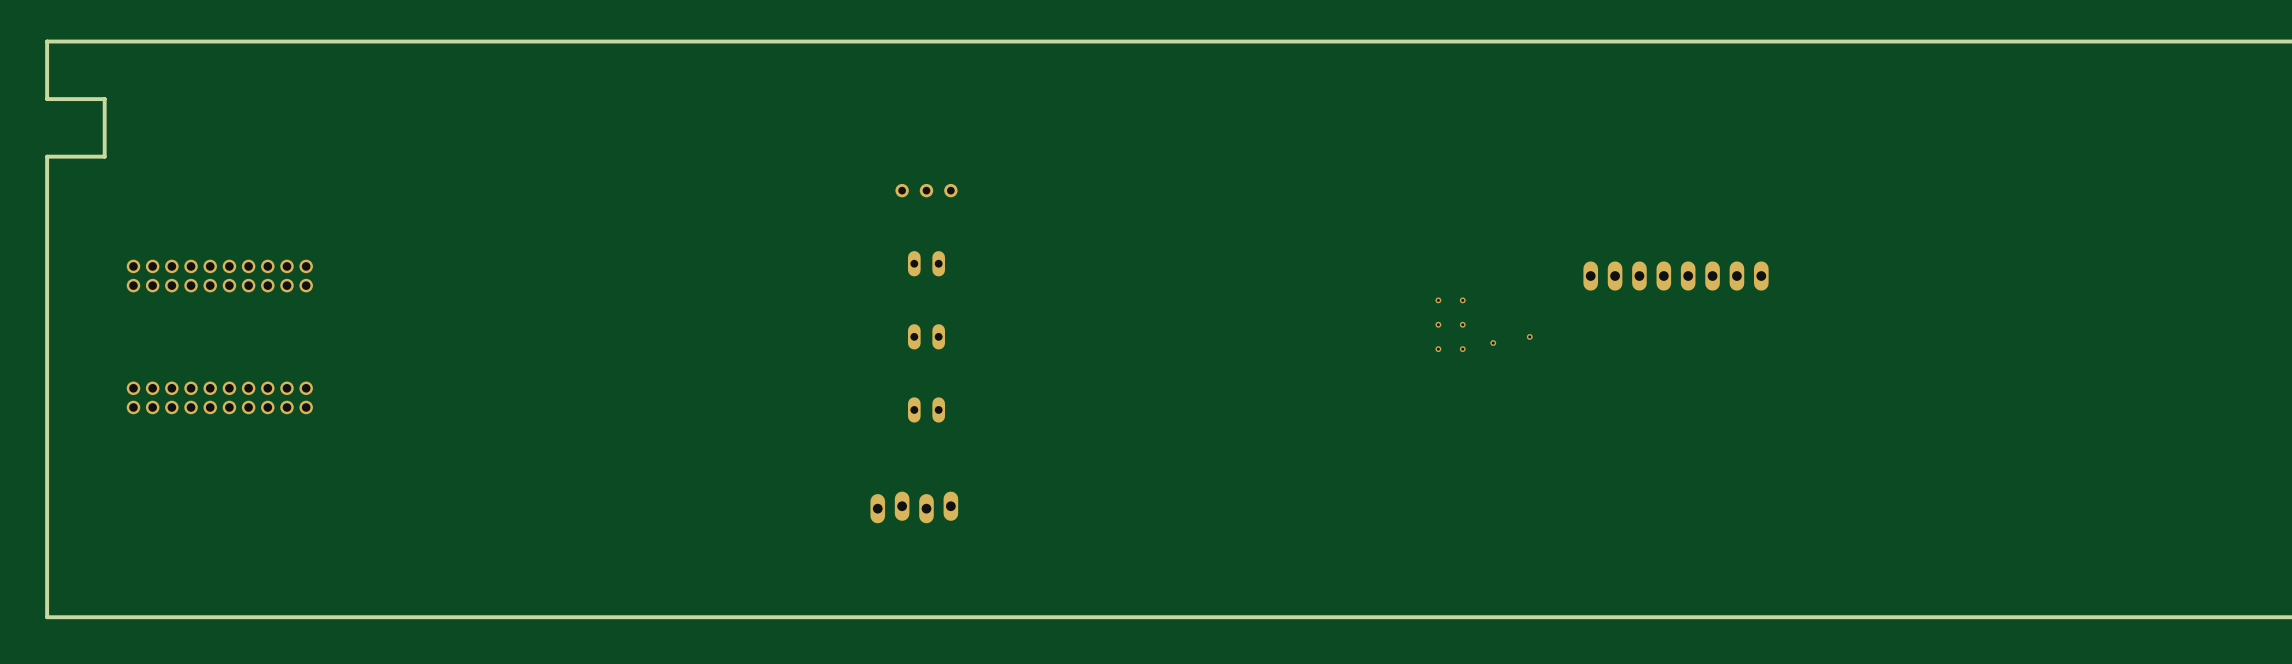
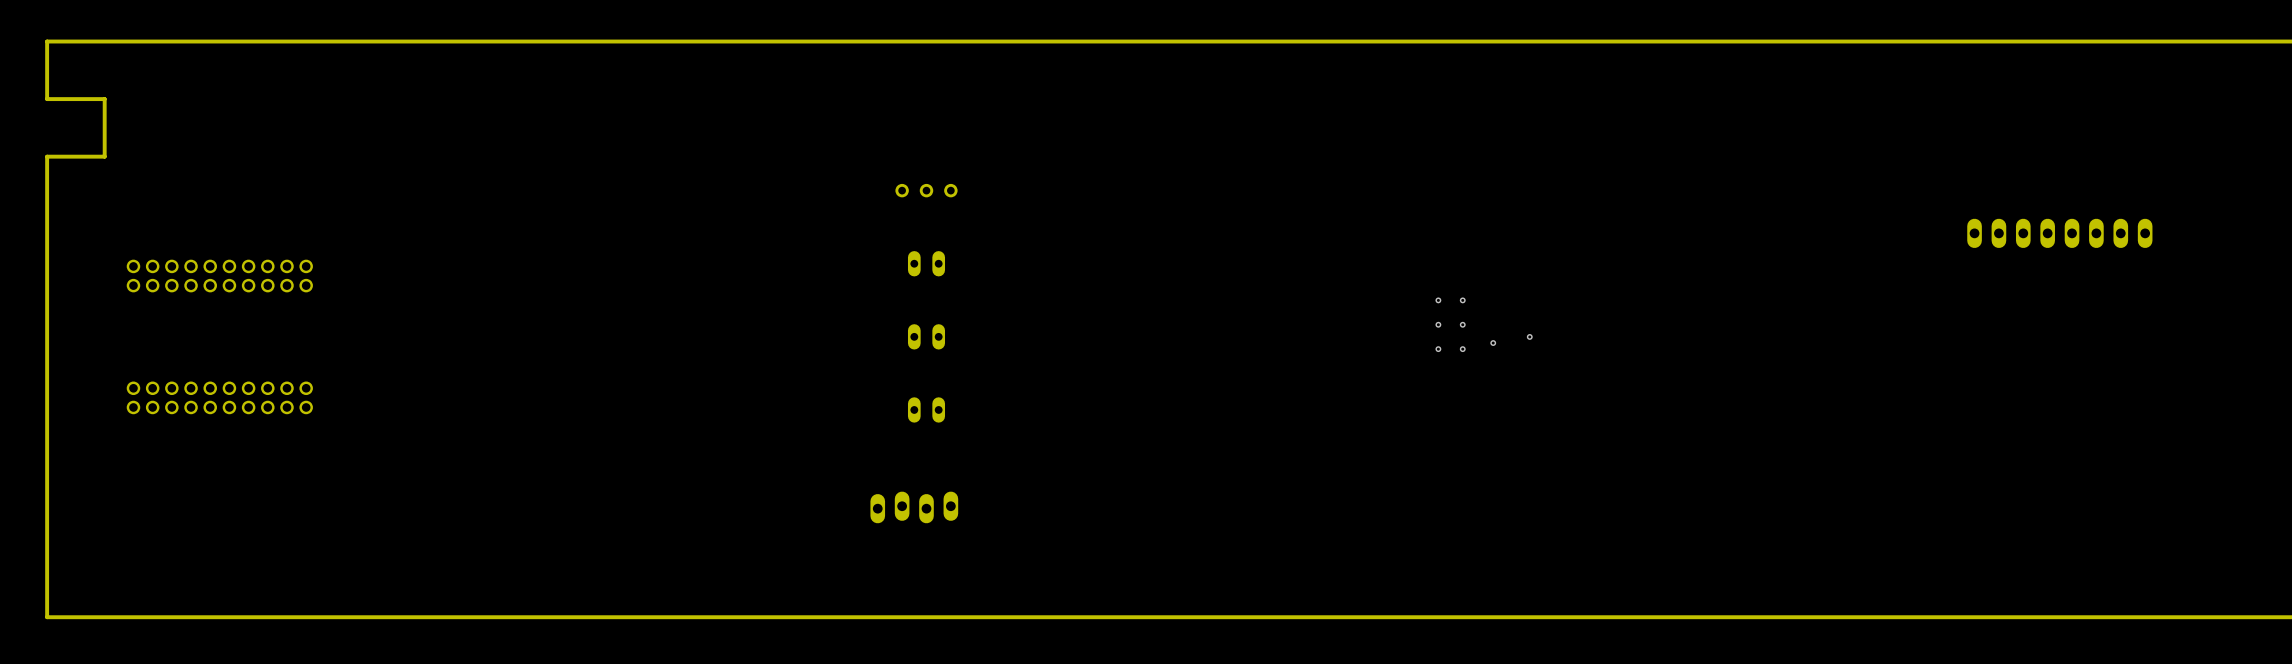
part: none -> (2059, 233)
part: (1676, 276) -> none

